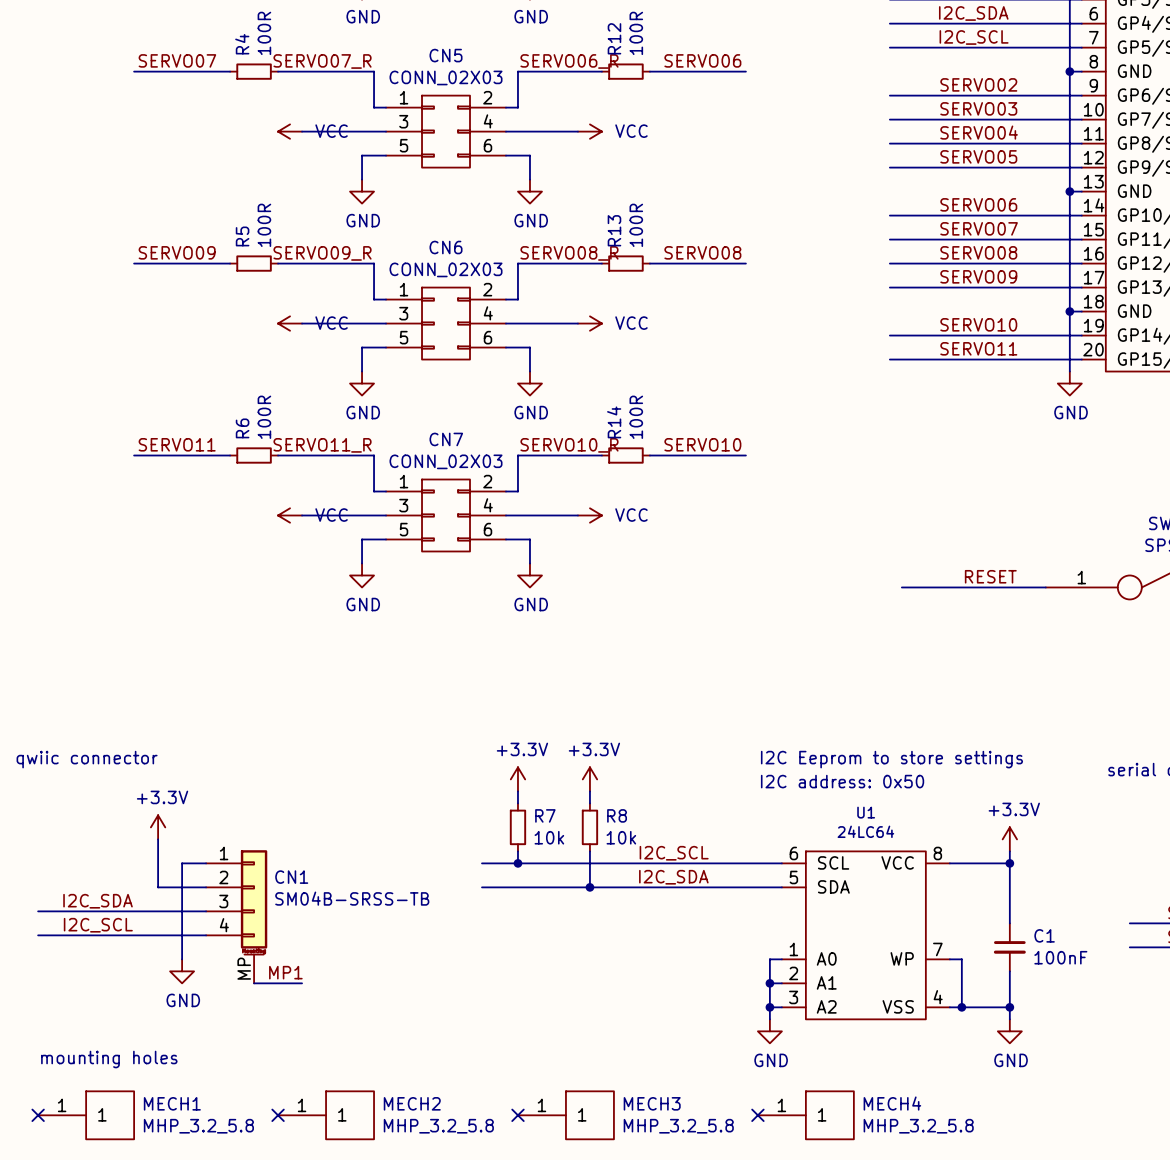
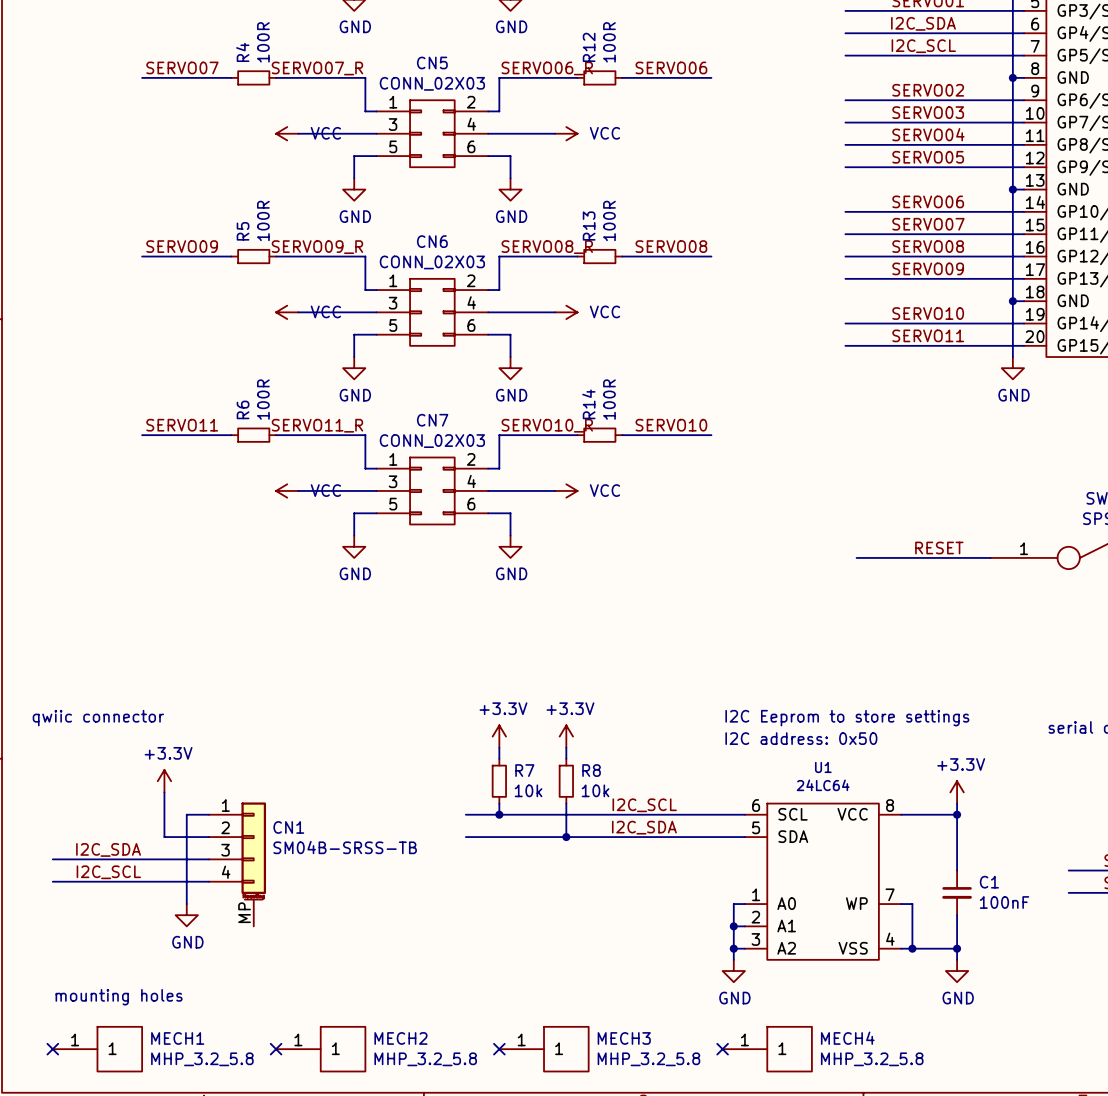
label: MP1 (285, 972) -> none
wire: (254, 983) (302, 983) -> none

